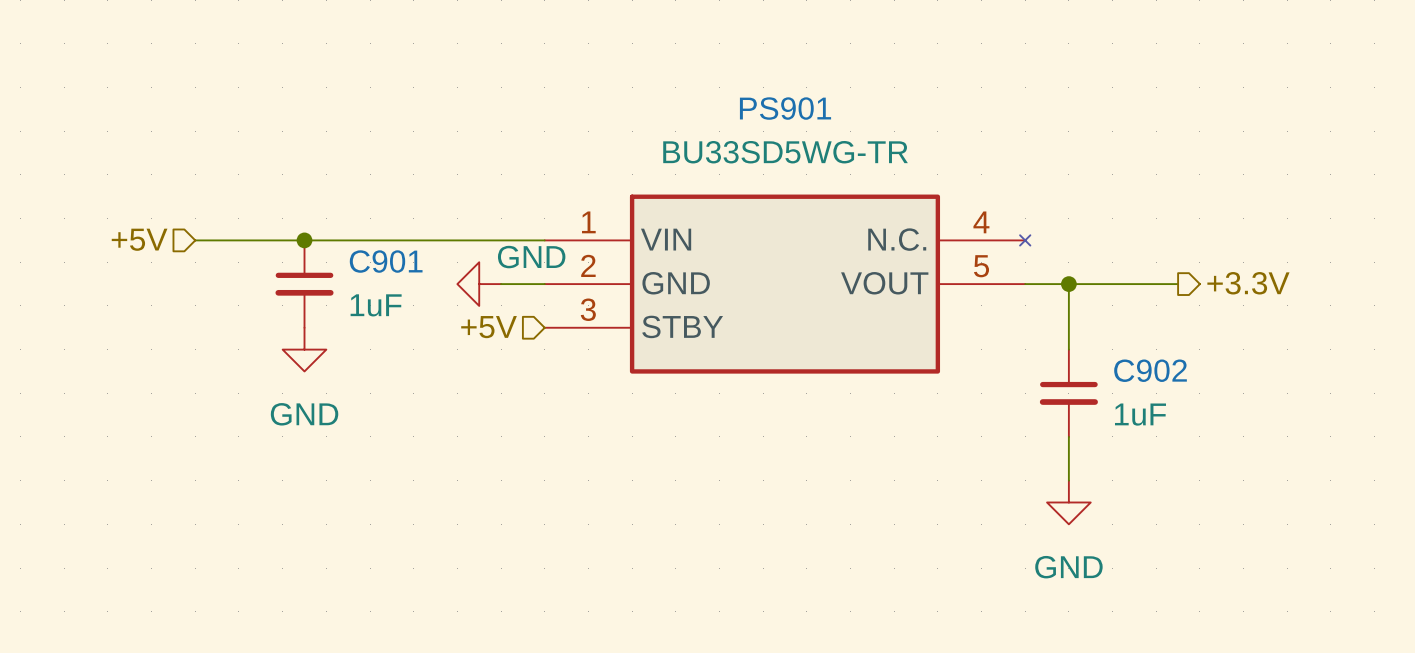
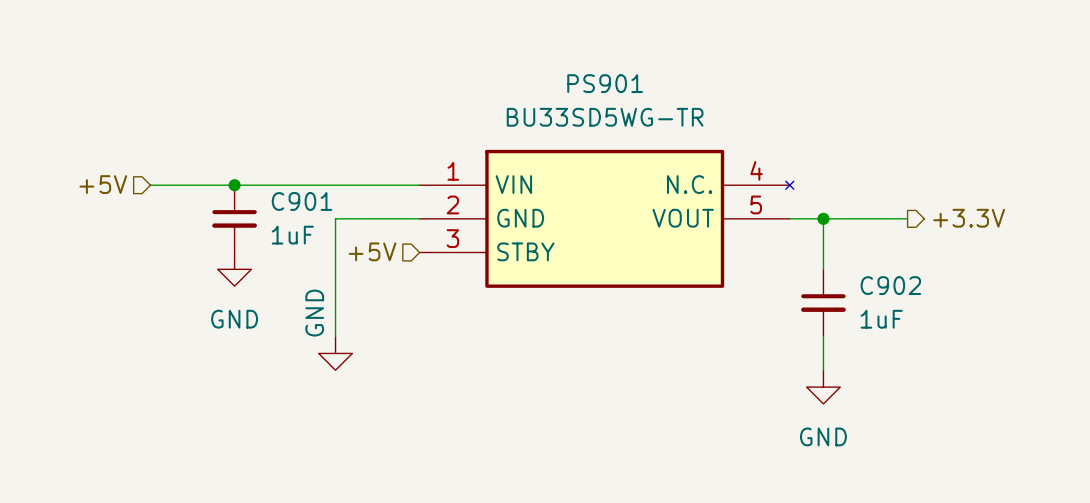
power symbol rotation: 0° (479, 284) -> 90° counterclockwise (335, 353)
power symbol position: GND (479, 284) -> GND (335, 353)
wire: none -> (386, 218) (335, 218) (335, 336)

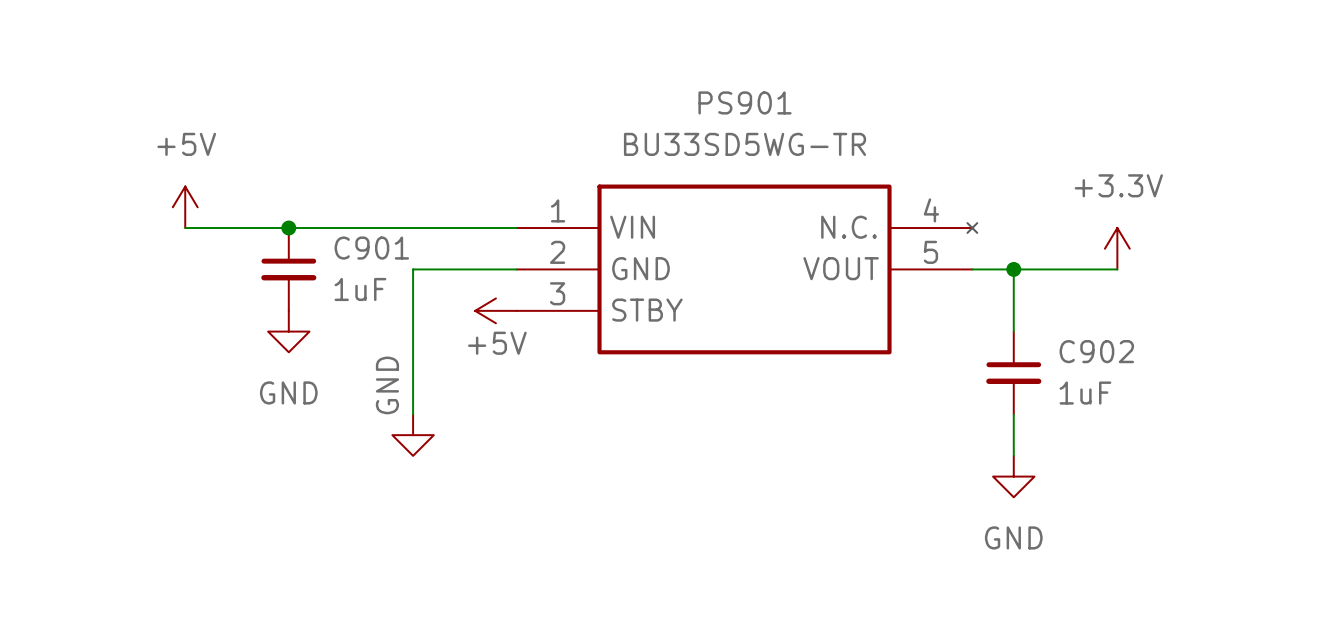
power symbol: none -> +5V (185, 207)
hierarchical label: +5V (103, 184) -> none
power symbol: none -> +3.3V (1117, 248)
hierarchical label: +3.3V (969, 218) -> none
hierarchical label: +5V (372, 251) -> none
power symbol: none -> +5V (495, 310)

